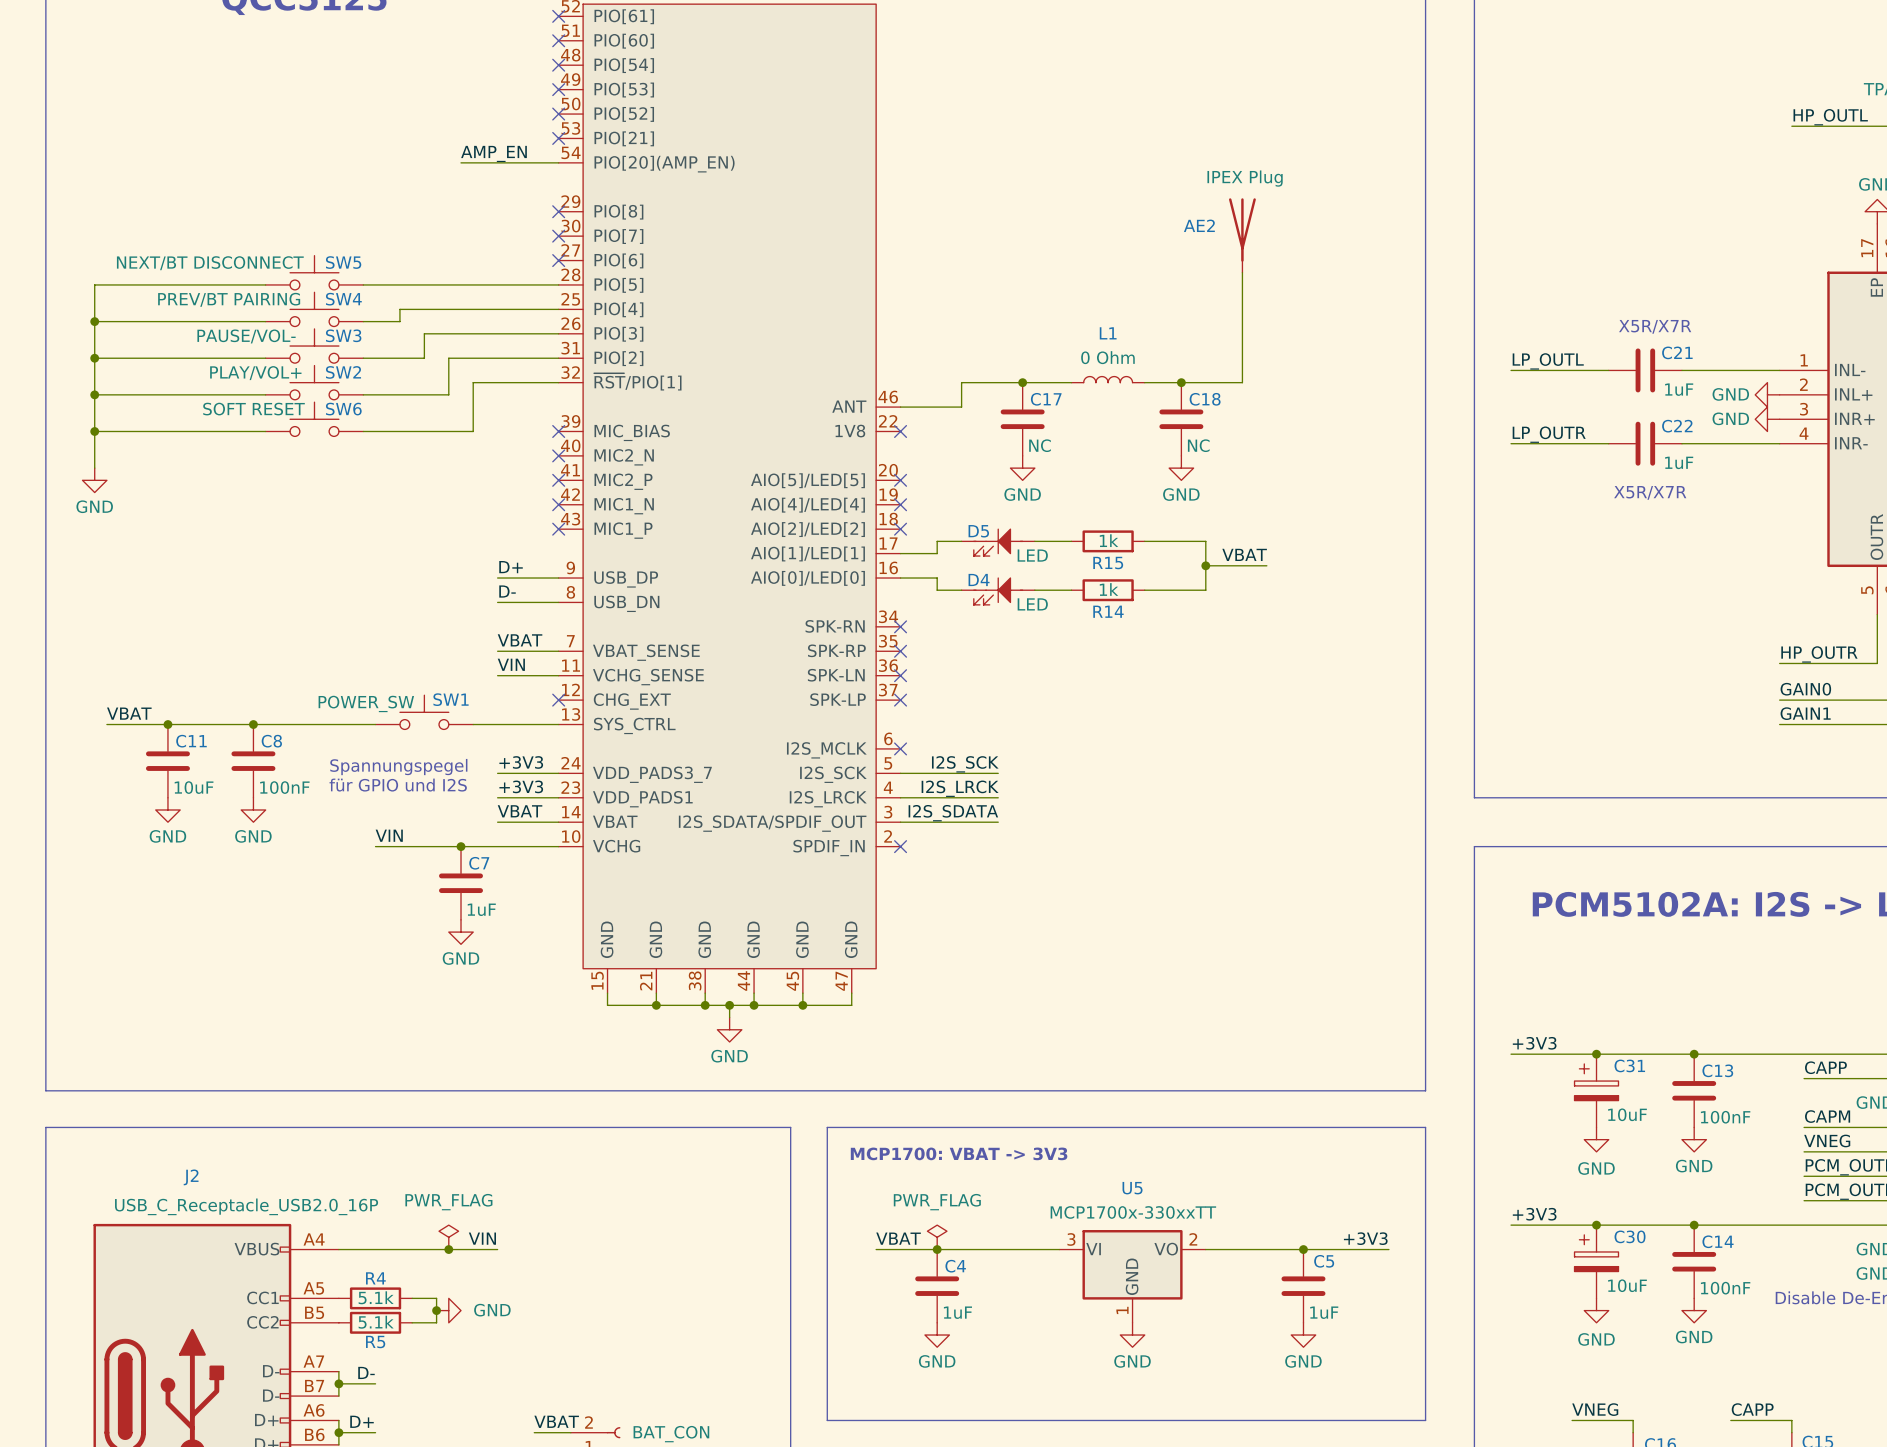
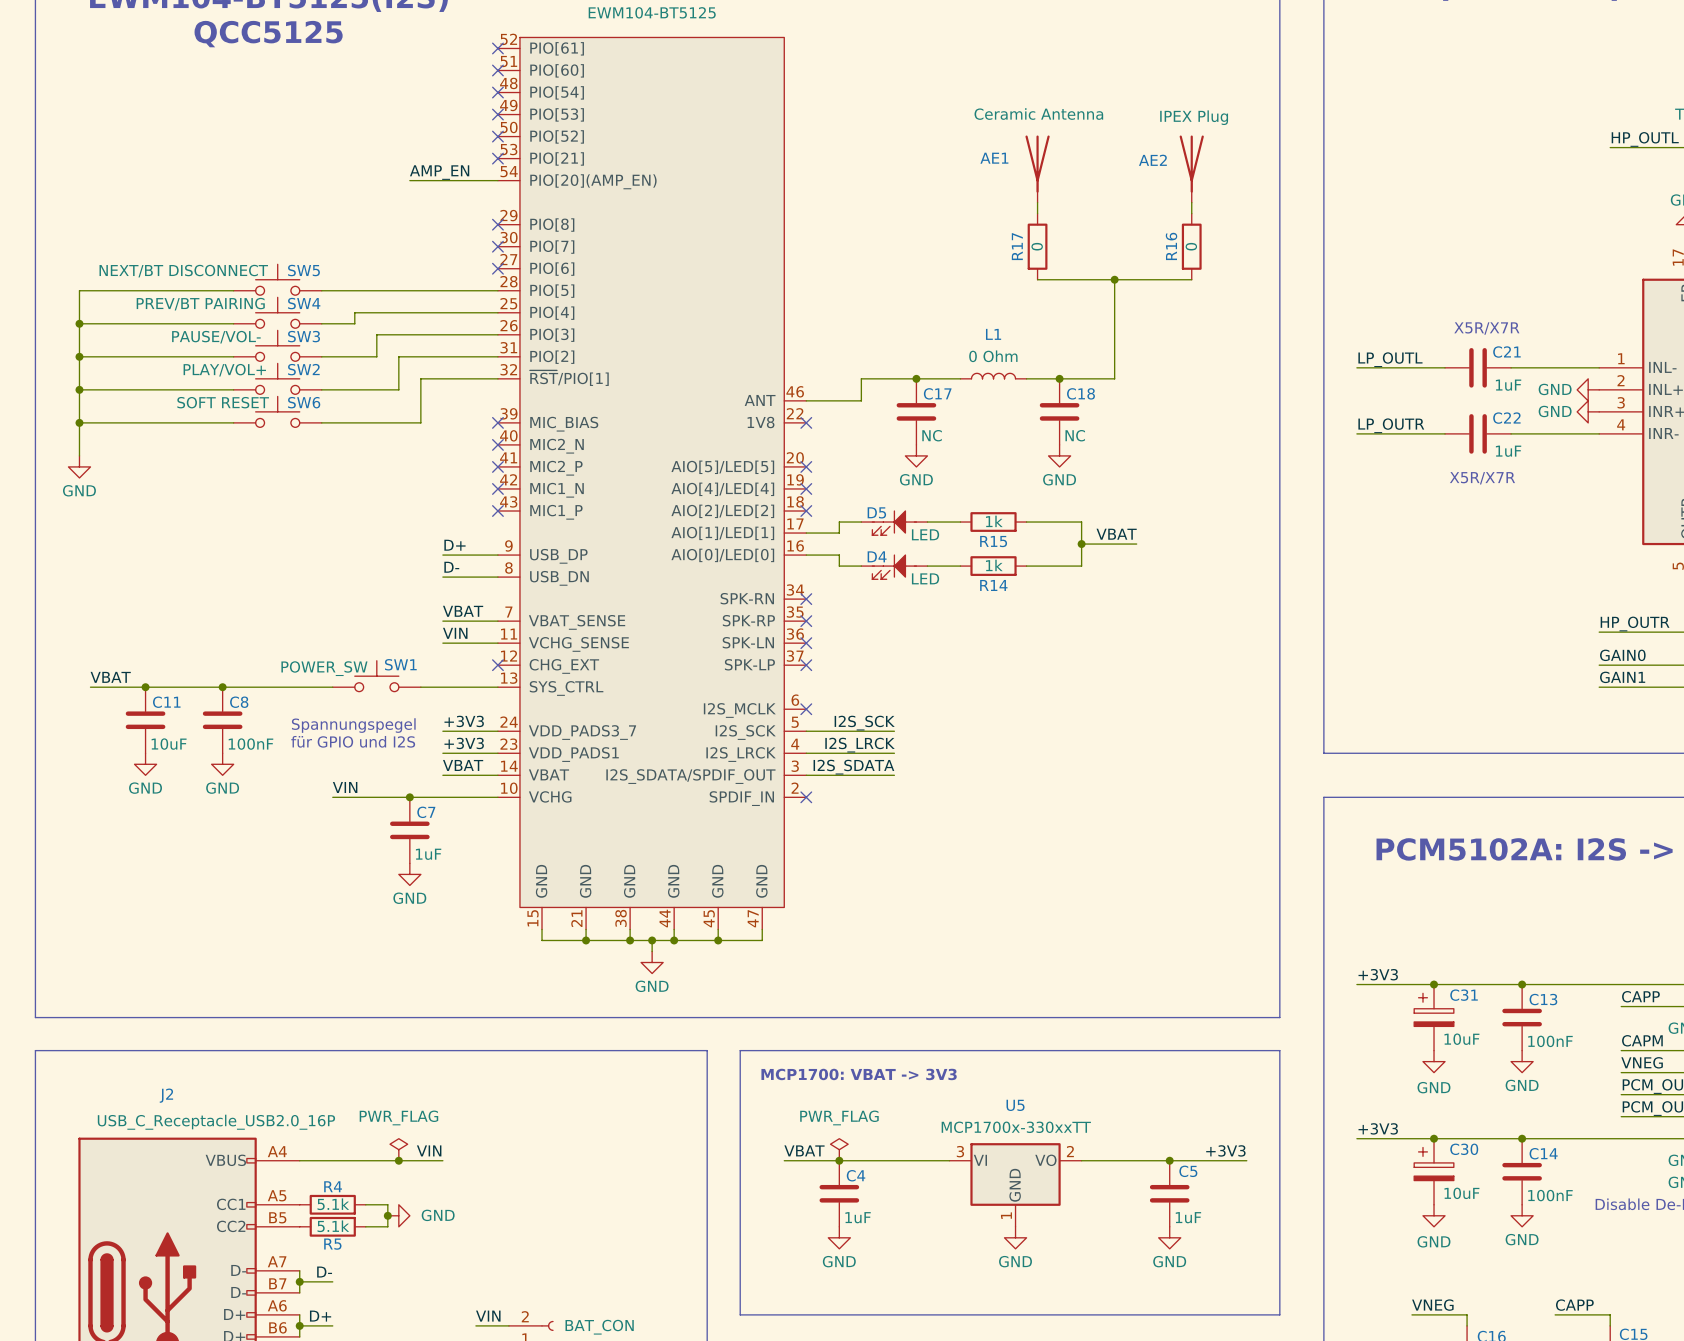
AE1: none -> Ceramic Antenna (1037, 169)
wire: none -> (1037, 202) (1037, 213)
wire: none -> (1191, 202) (1191, 213)
AE2 position: (1242, 235) -> (1191, 169)
R17: none -> 0 (1037, 246)
R16: none -> 0 (1191, 246)
wire: none -> (1037, 279) (1191, 279)
junction: none -> (1114, 279)
label: VBAT (556, 1421) -> VIN (488, 1316)

